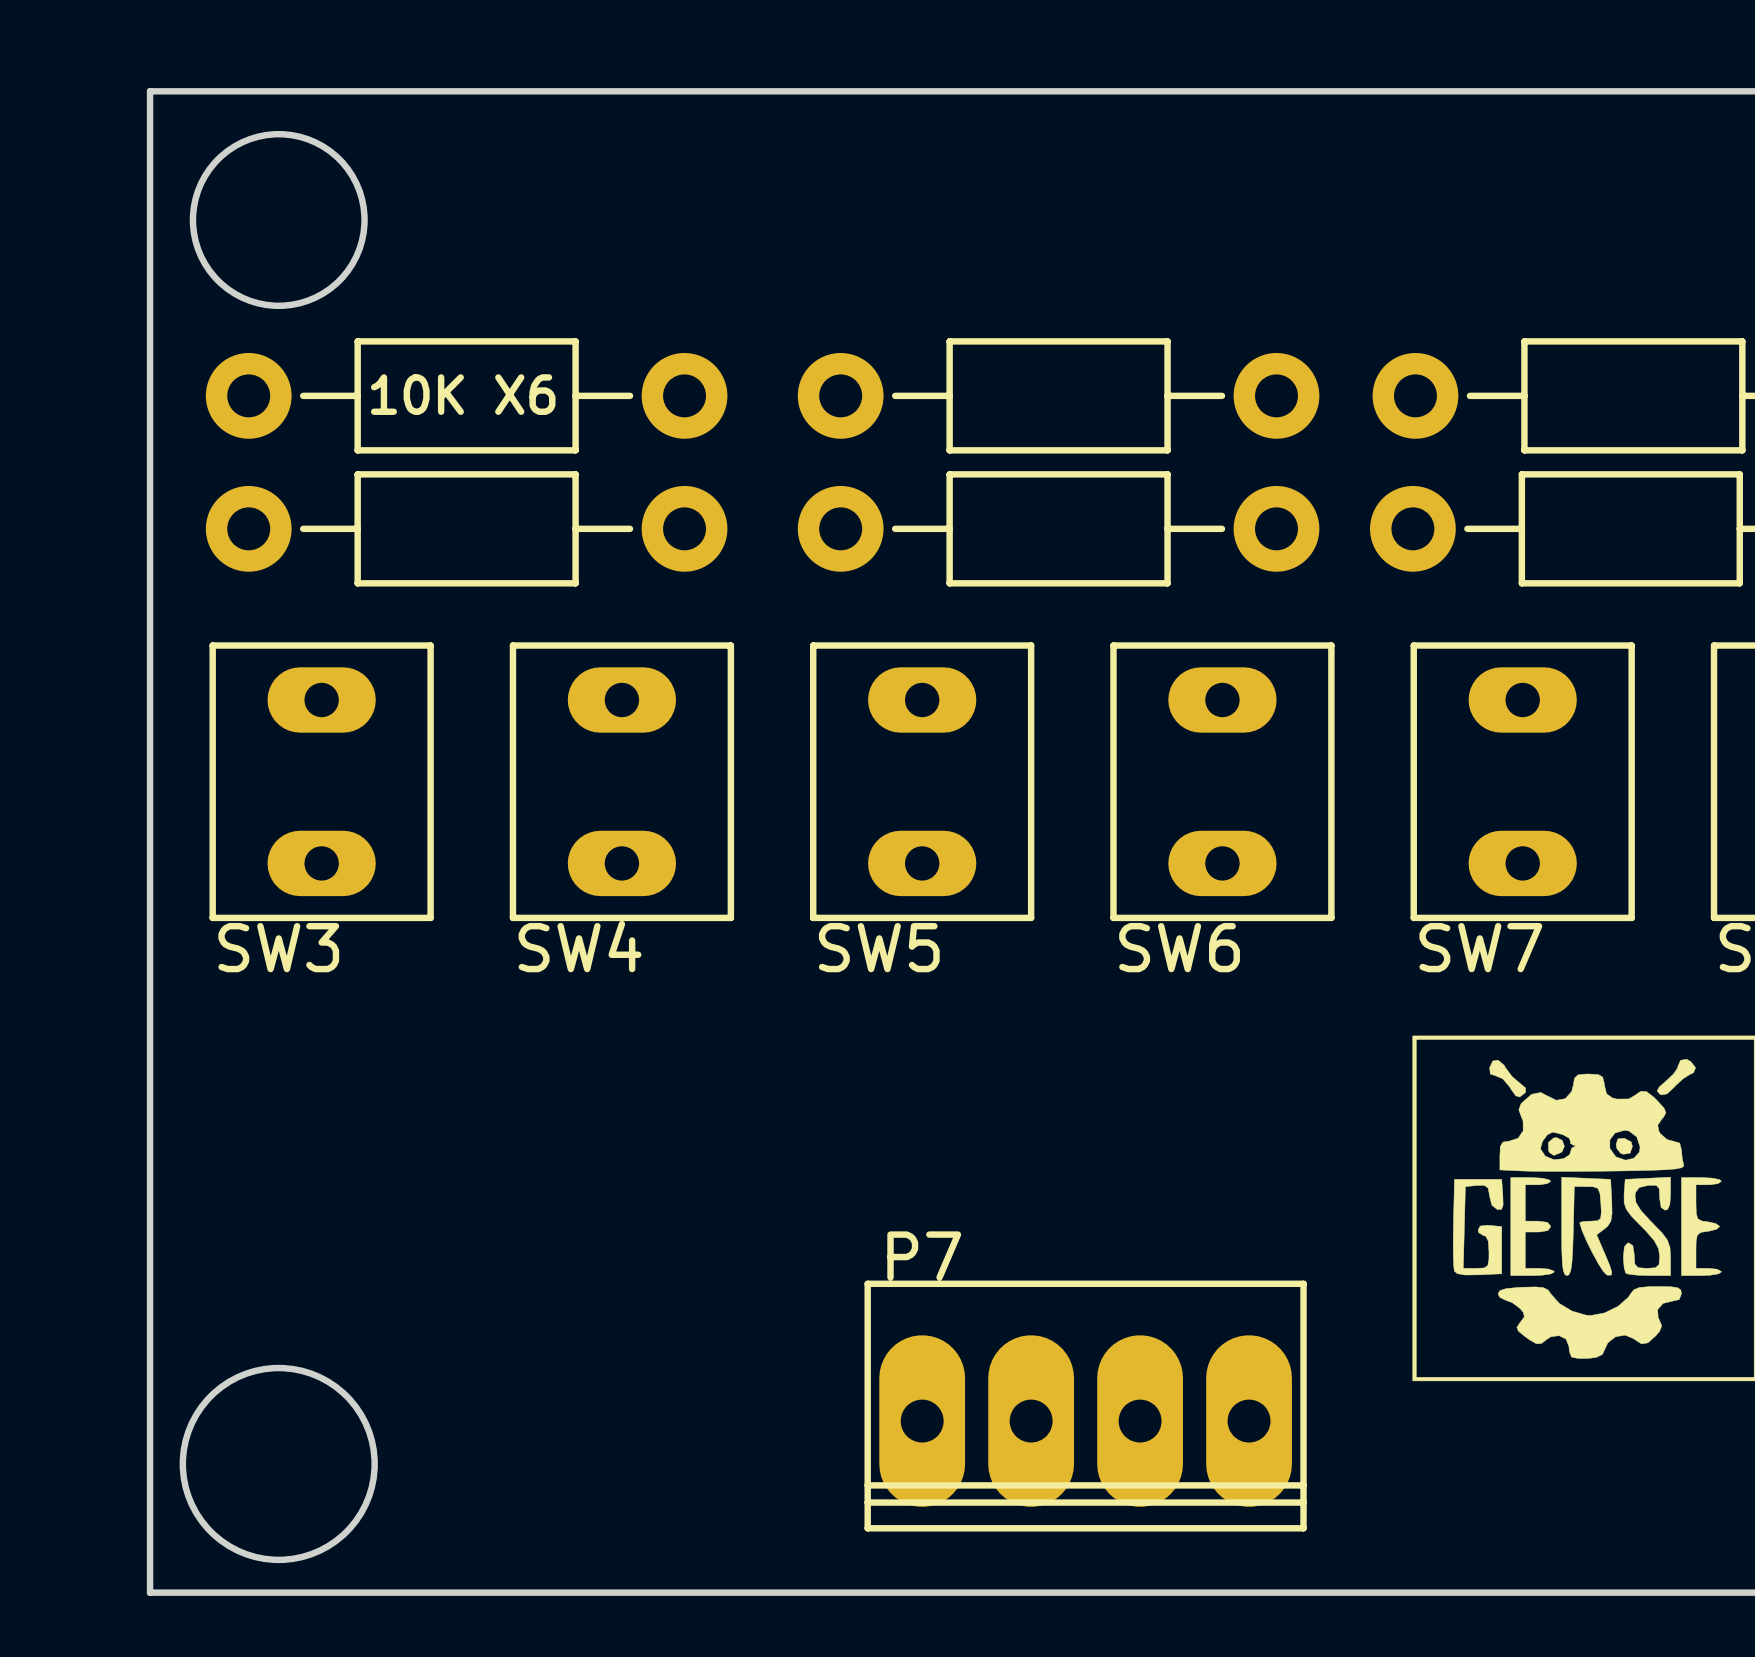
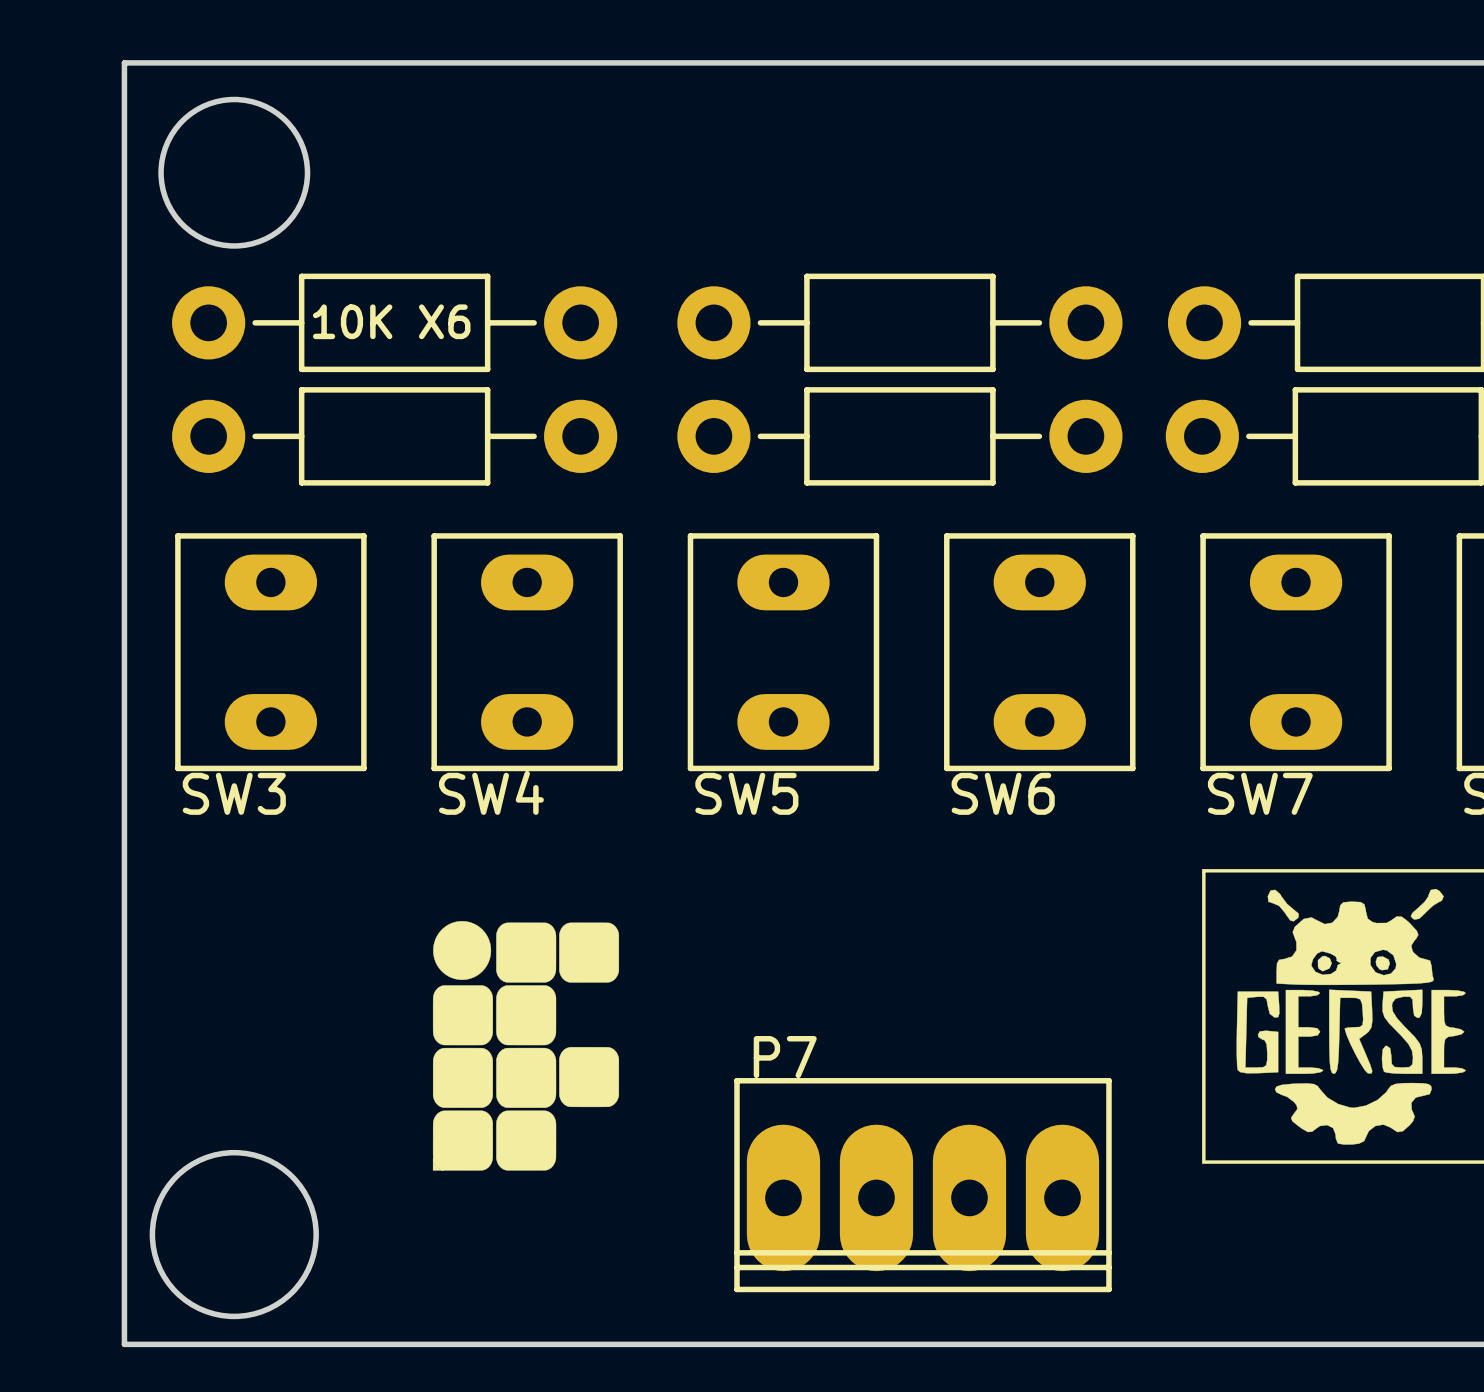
drawing: none -> [432, 921, 620, 1171]

